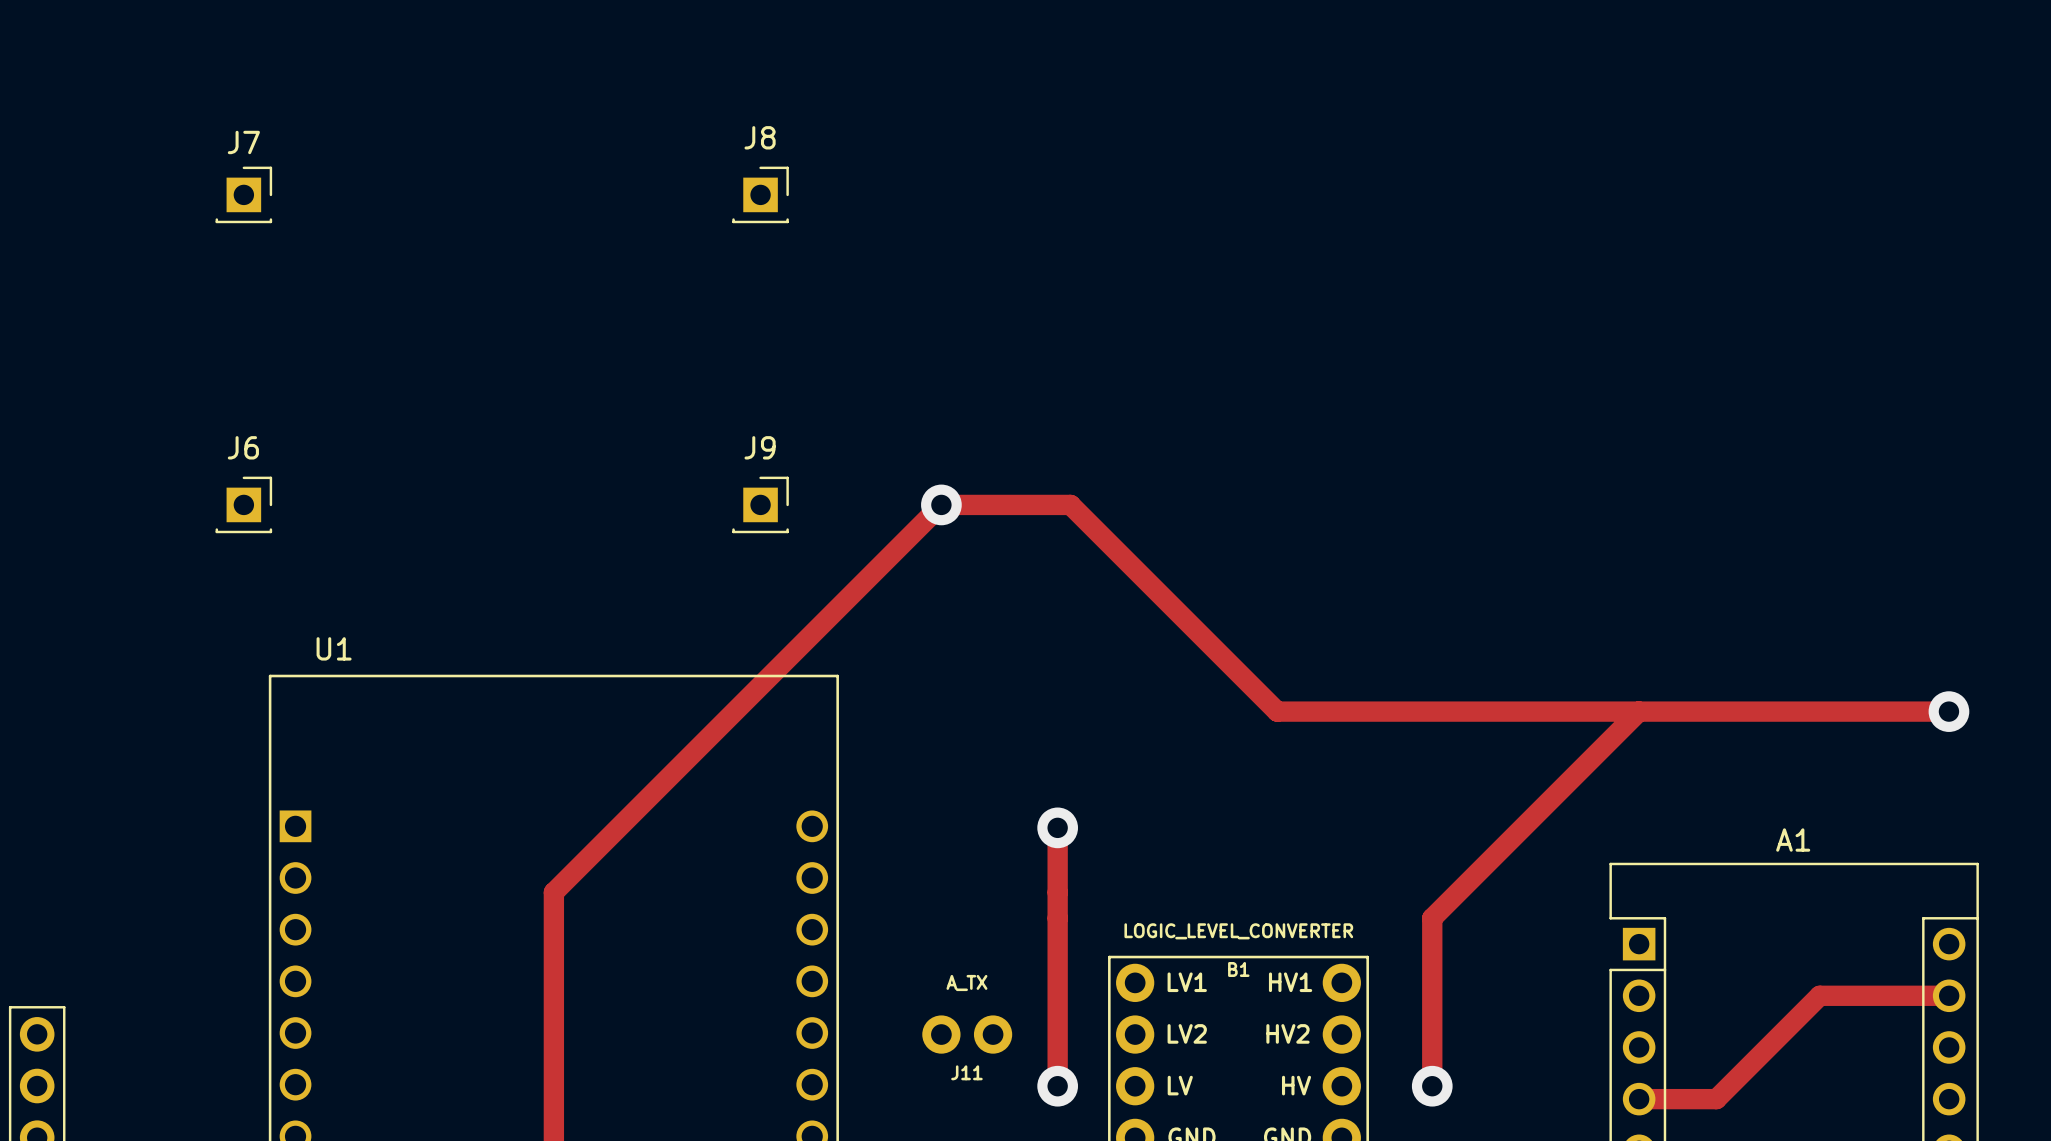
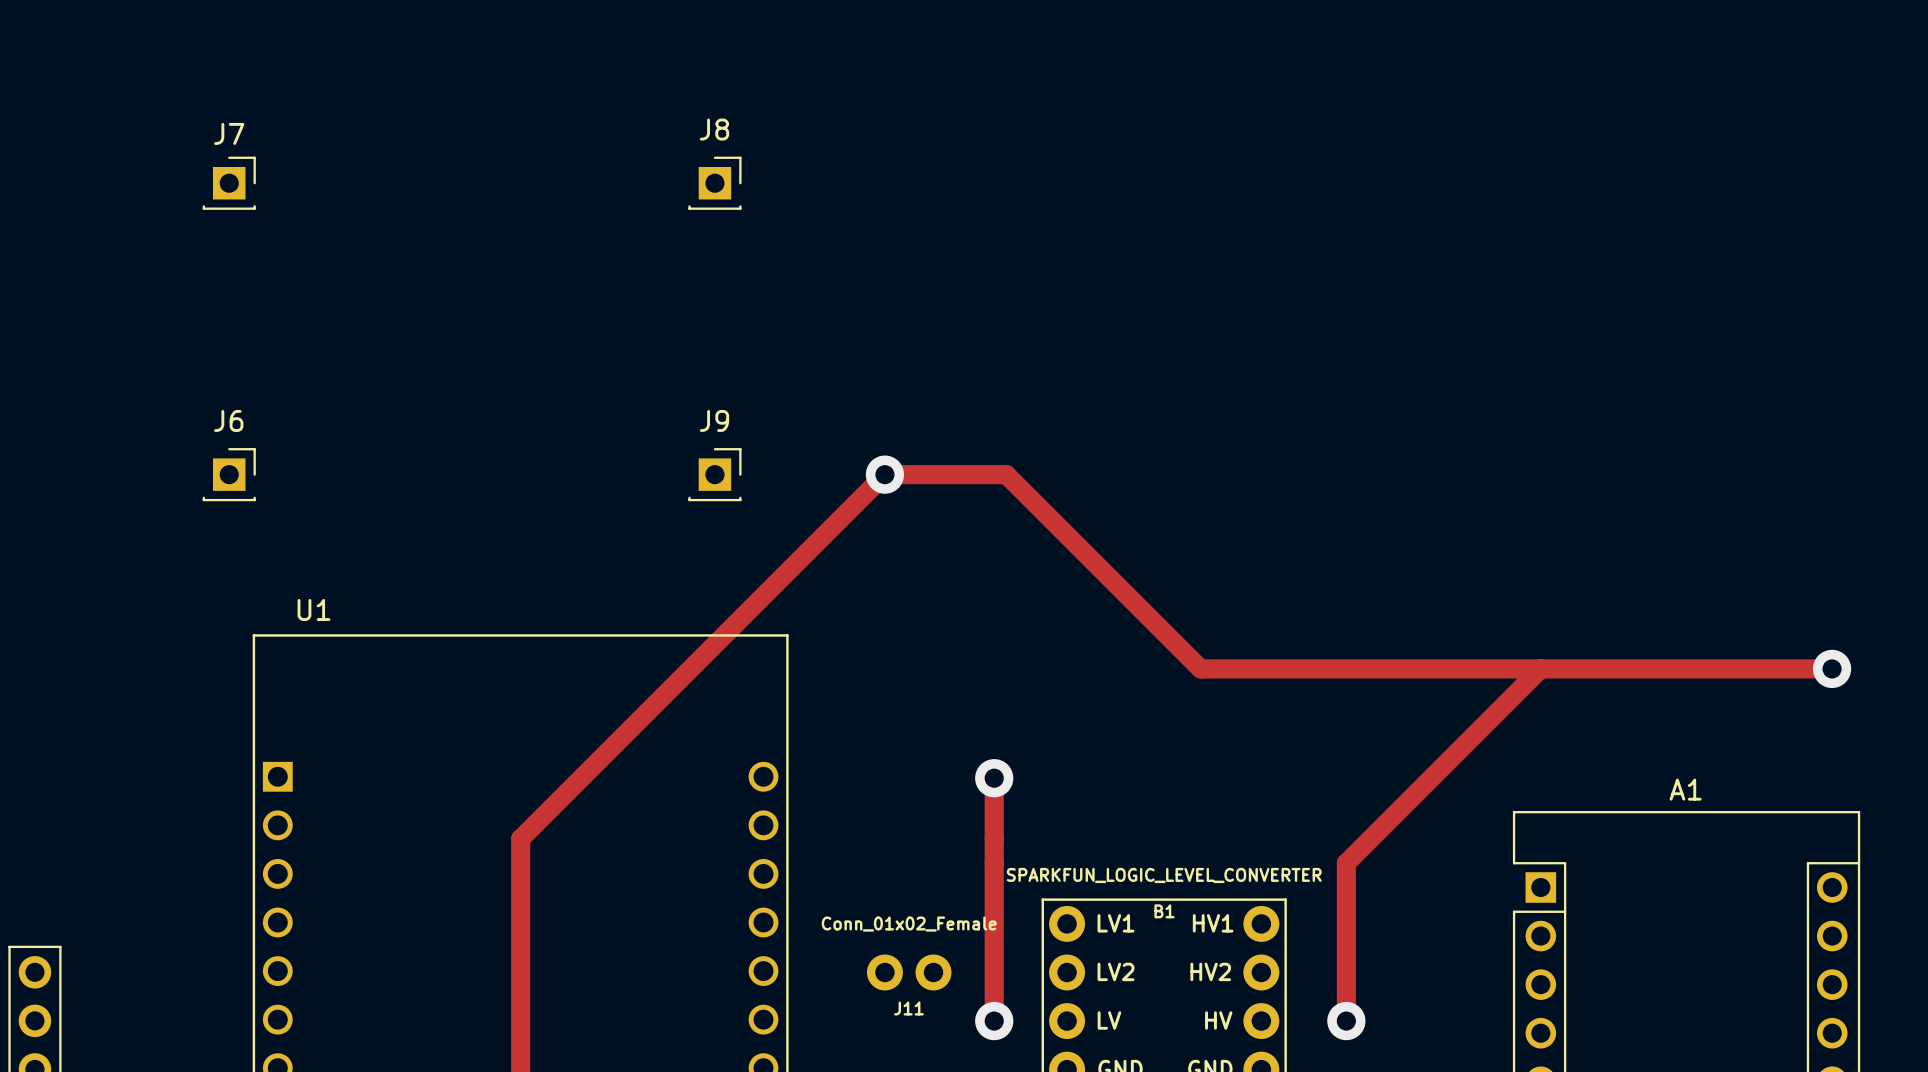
B1 value: LOGIC_LEVEL_CONVERTER (1238, 931) -> SPARKFUN_LOGIC_LEVEL_CONVERTER (1164, 875)
J11 value: A_TX (966, 983) -> Conn_01x02_Female (909, 924)
track: (1949, 995) (1819, 995) (1716, 1099) (1639, 1099) -> none

